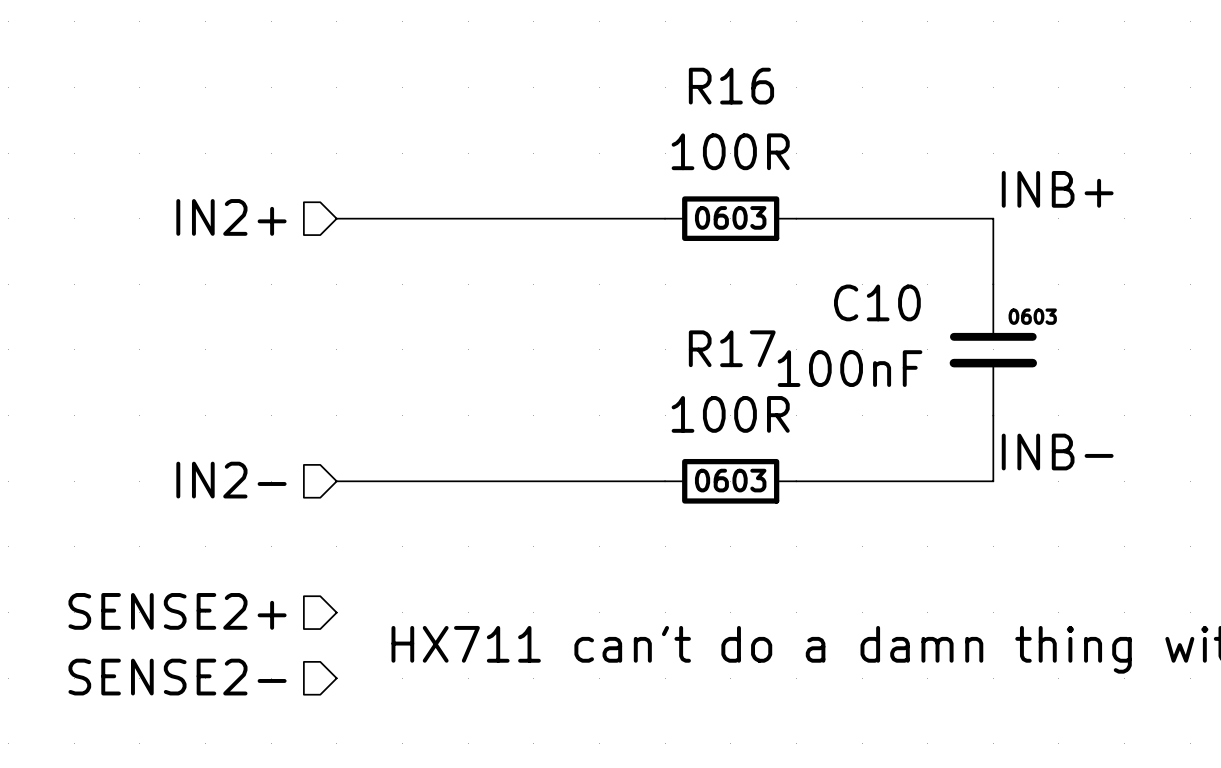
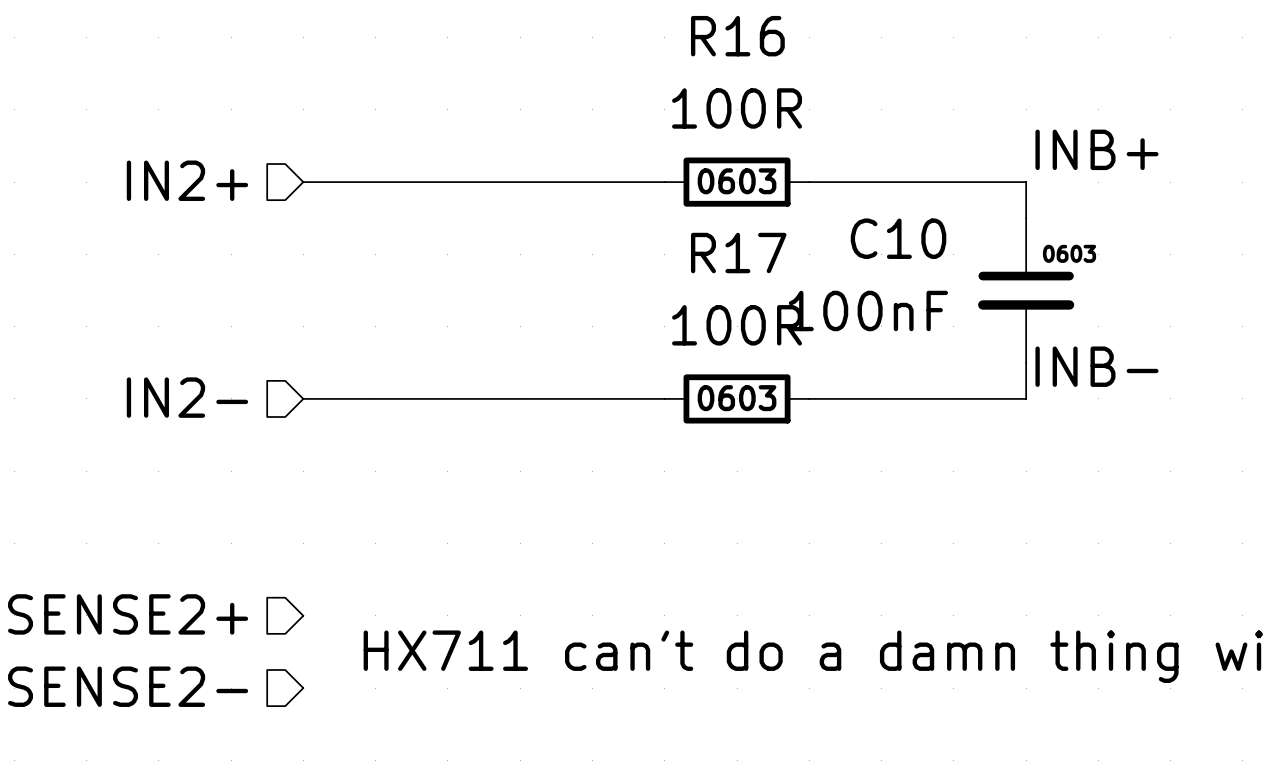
C10 position: (993, 349) -> (1026, 290)
wire: none -> (1026, 362) (1026, 398) (809, 398)
wire: (993, 415) (993, 481) (796, 481) -> none
label position: INB- (1057, 452) -> INB- (1096, 366)
hierarchical label position: IN2- (231, 480) -> IN2- (187, 397)
wire: (336, 481) (665, 481) -> (303, 398) (664, 398)
R17 position: (730, 481) -> (737, 398)

